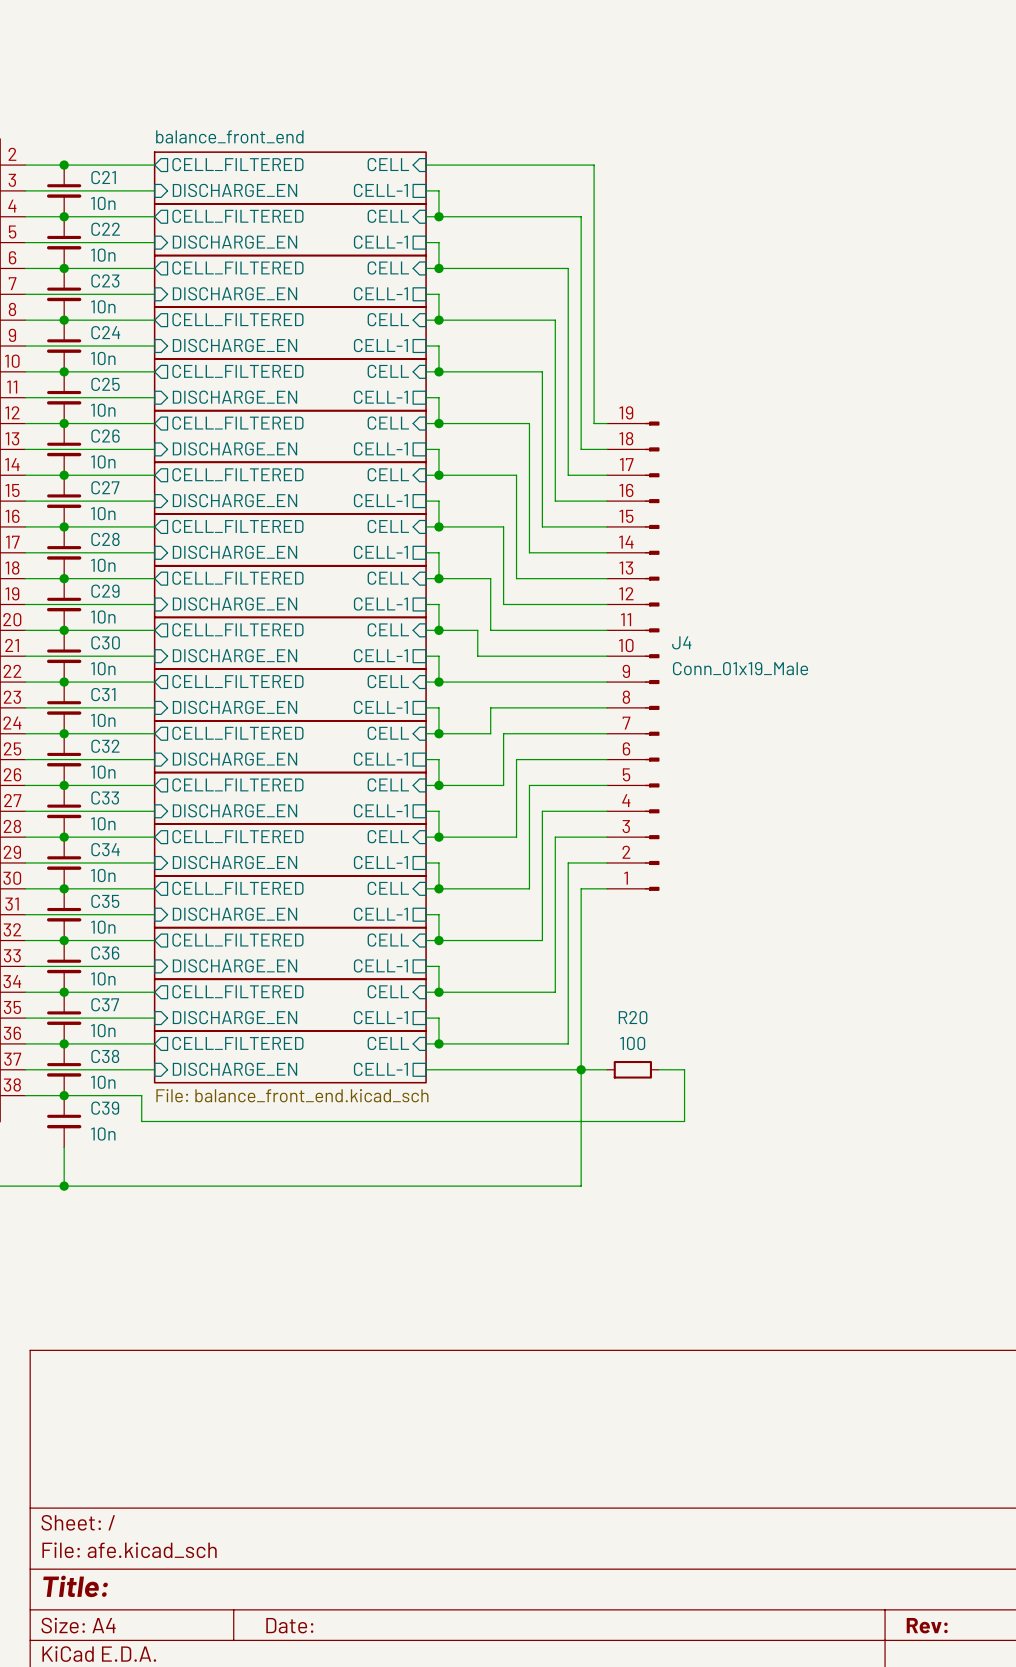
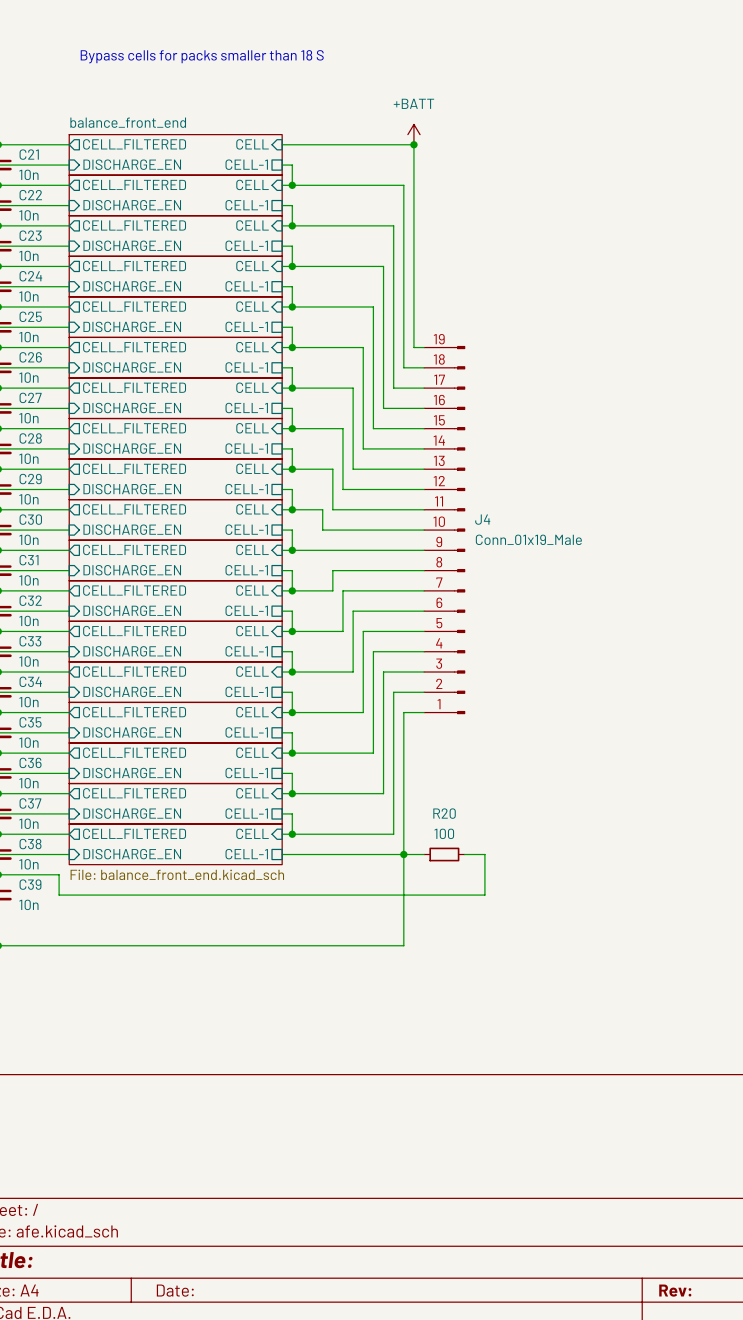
text: none -> Bypass cells for packs smaller than 18 S (202, 56)
power symbol: none -> +BATT (413, 134)
junction: none -> (413, 144)

